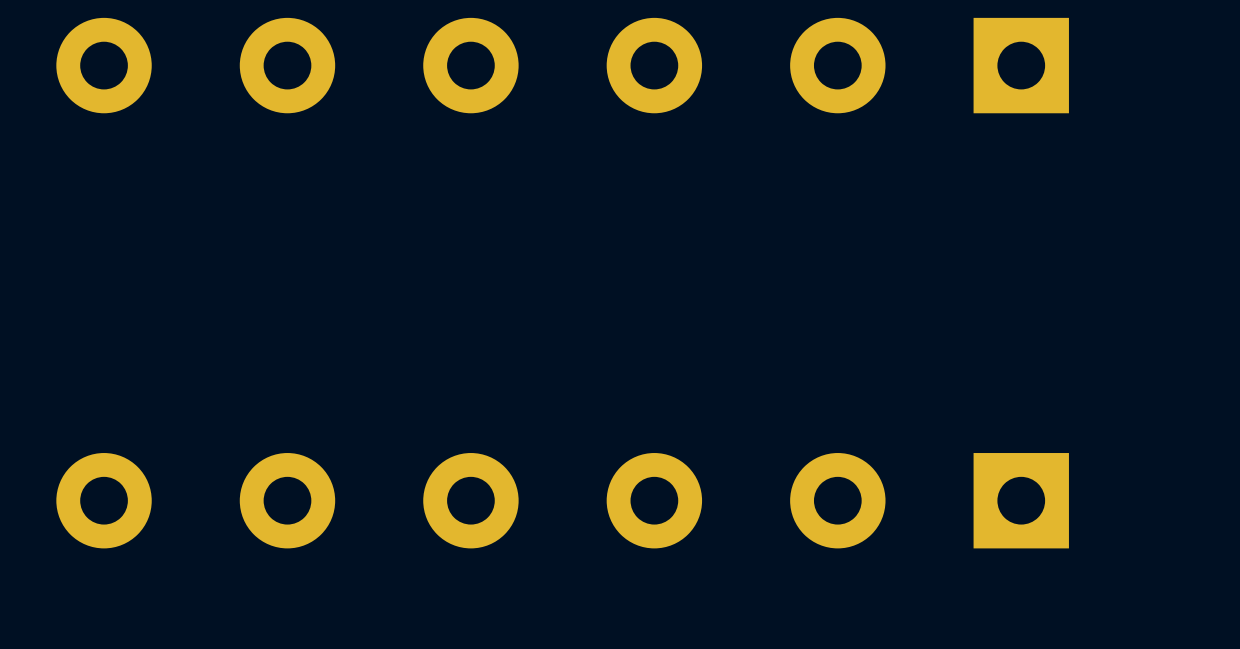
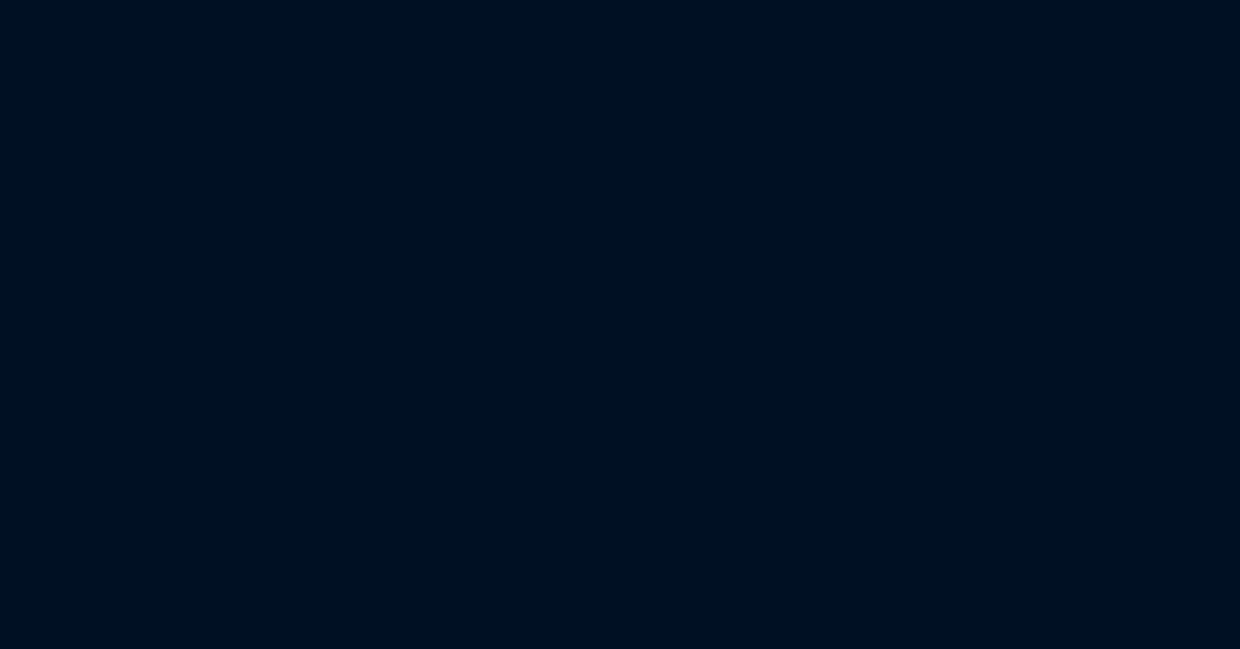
part: (562, 65) -> none
part: (562, 500) -> none

